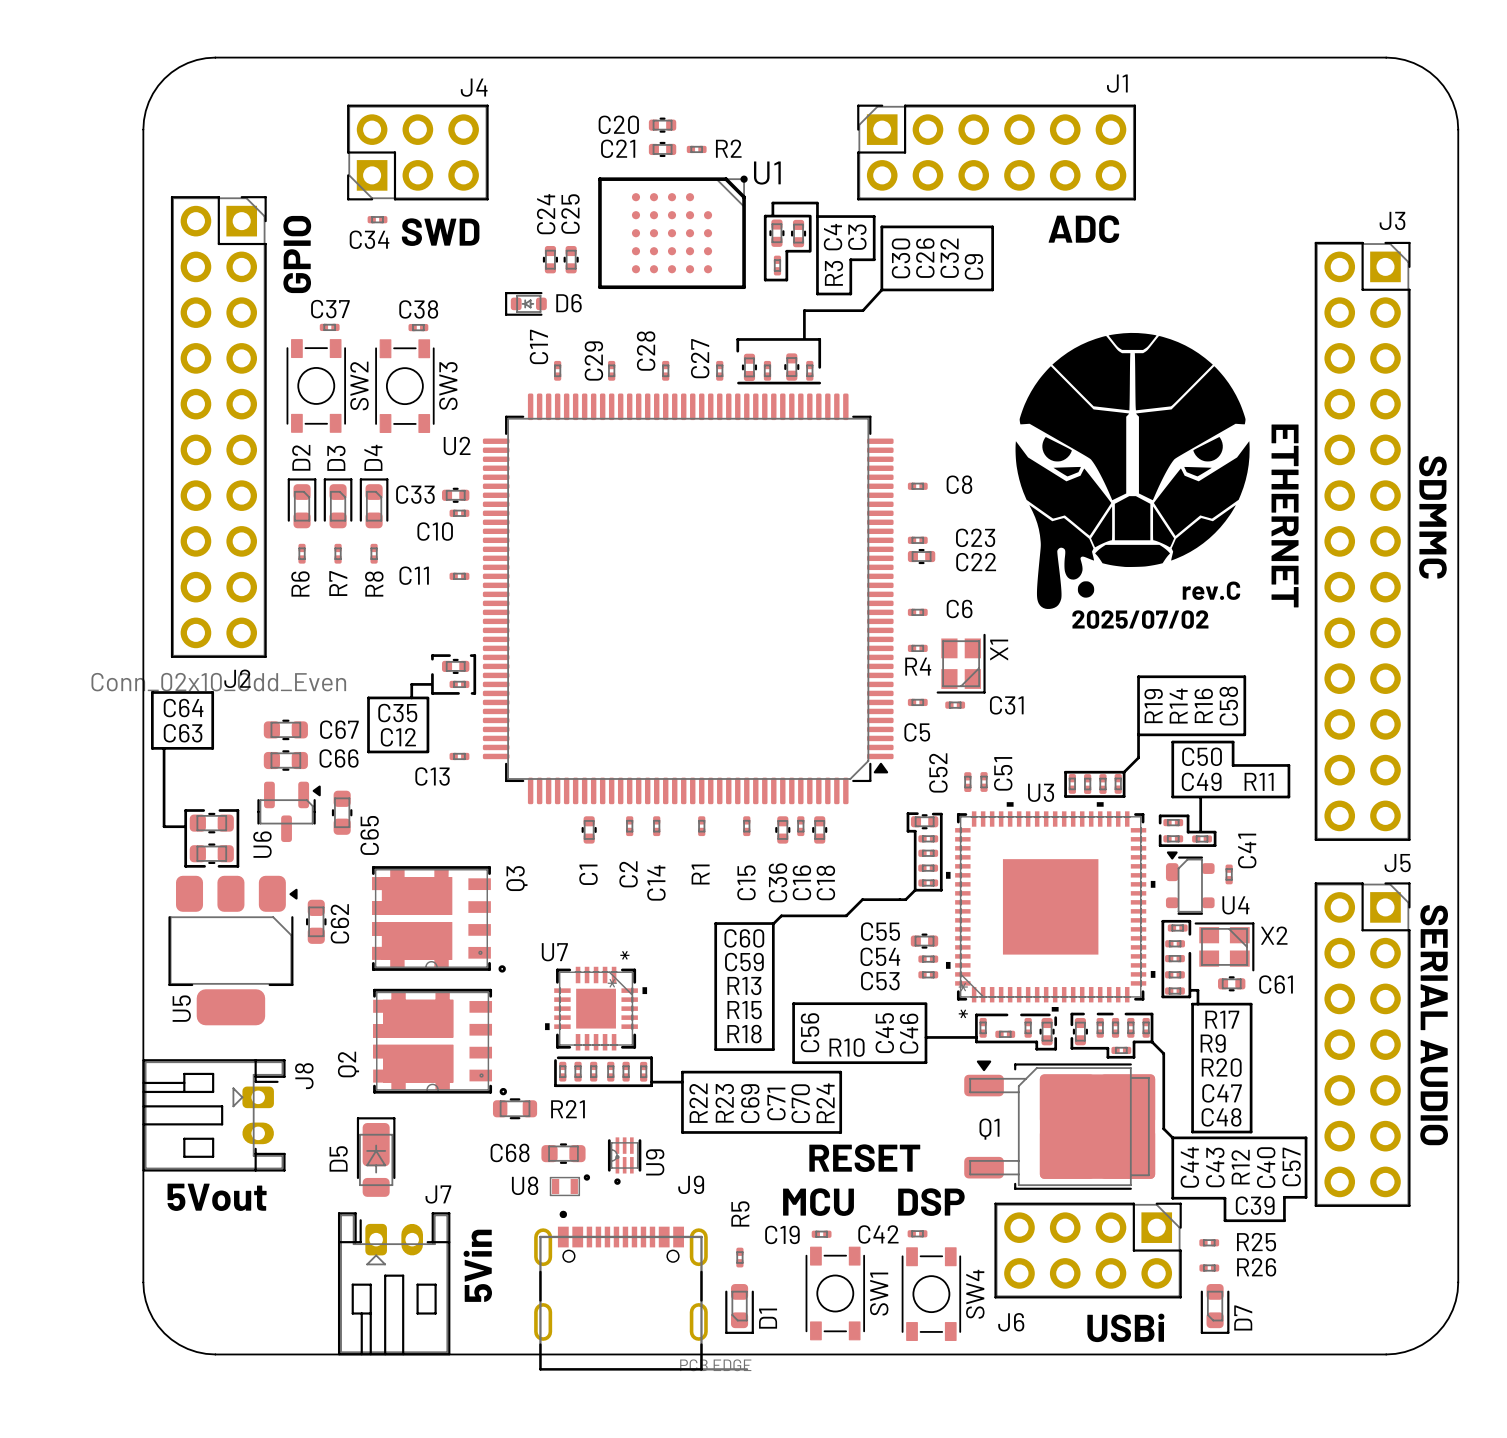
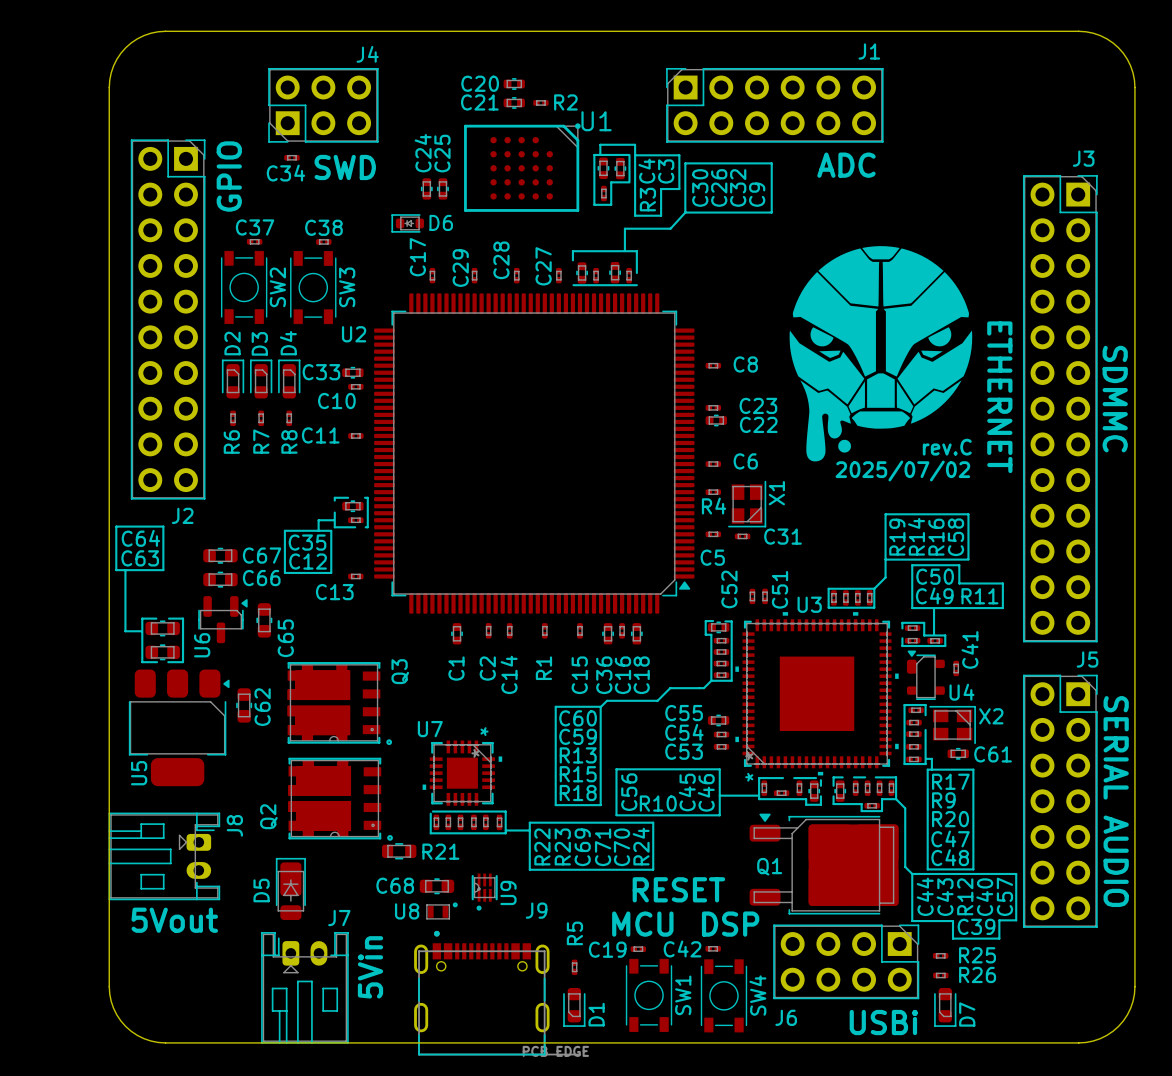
J2 value: Conn_02x10_Odd_Even (218, 682) -> none

